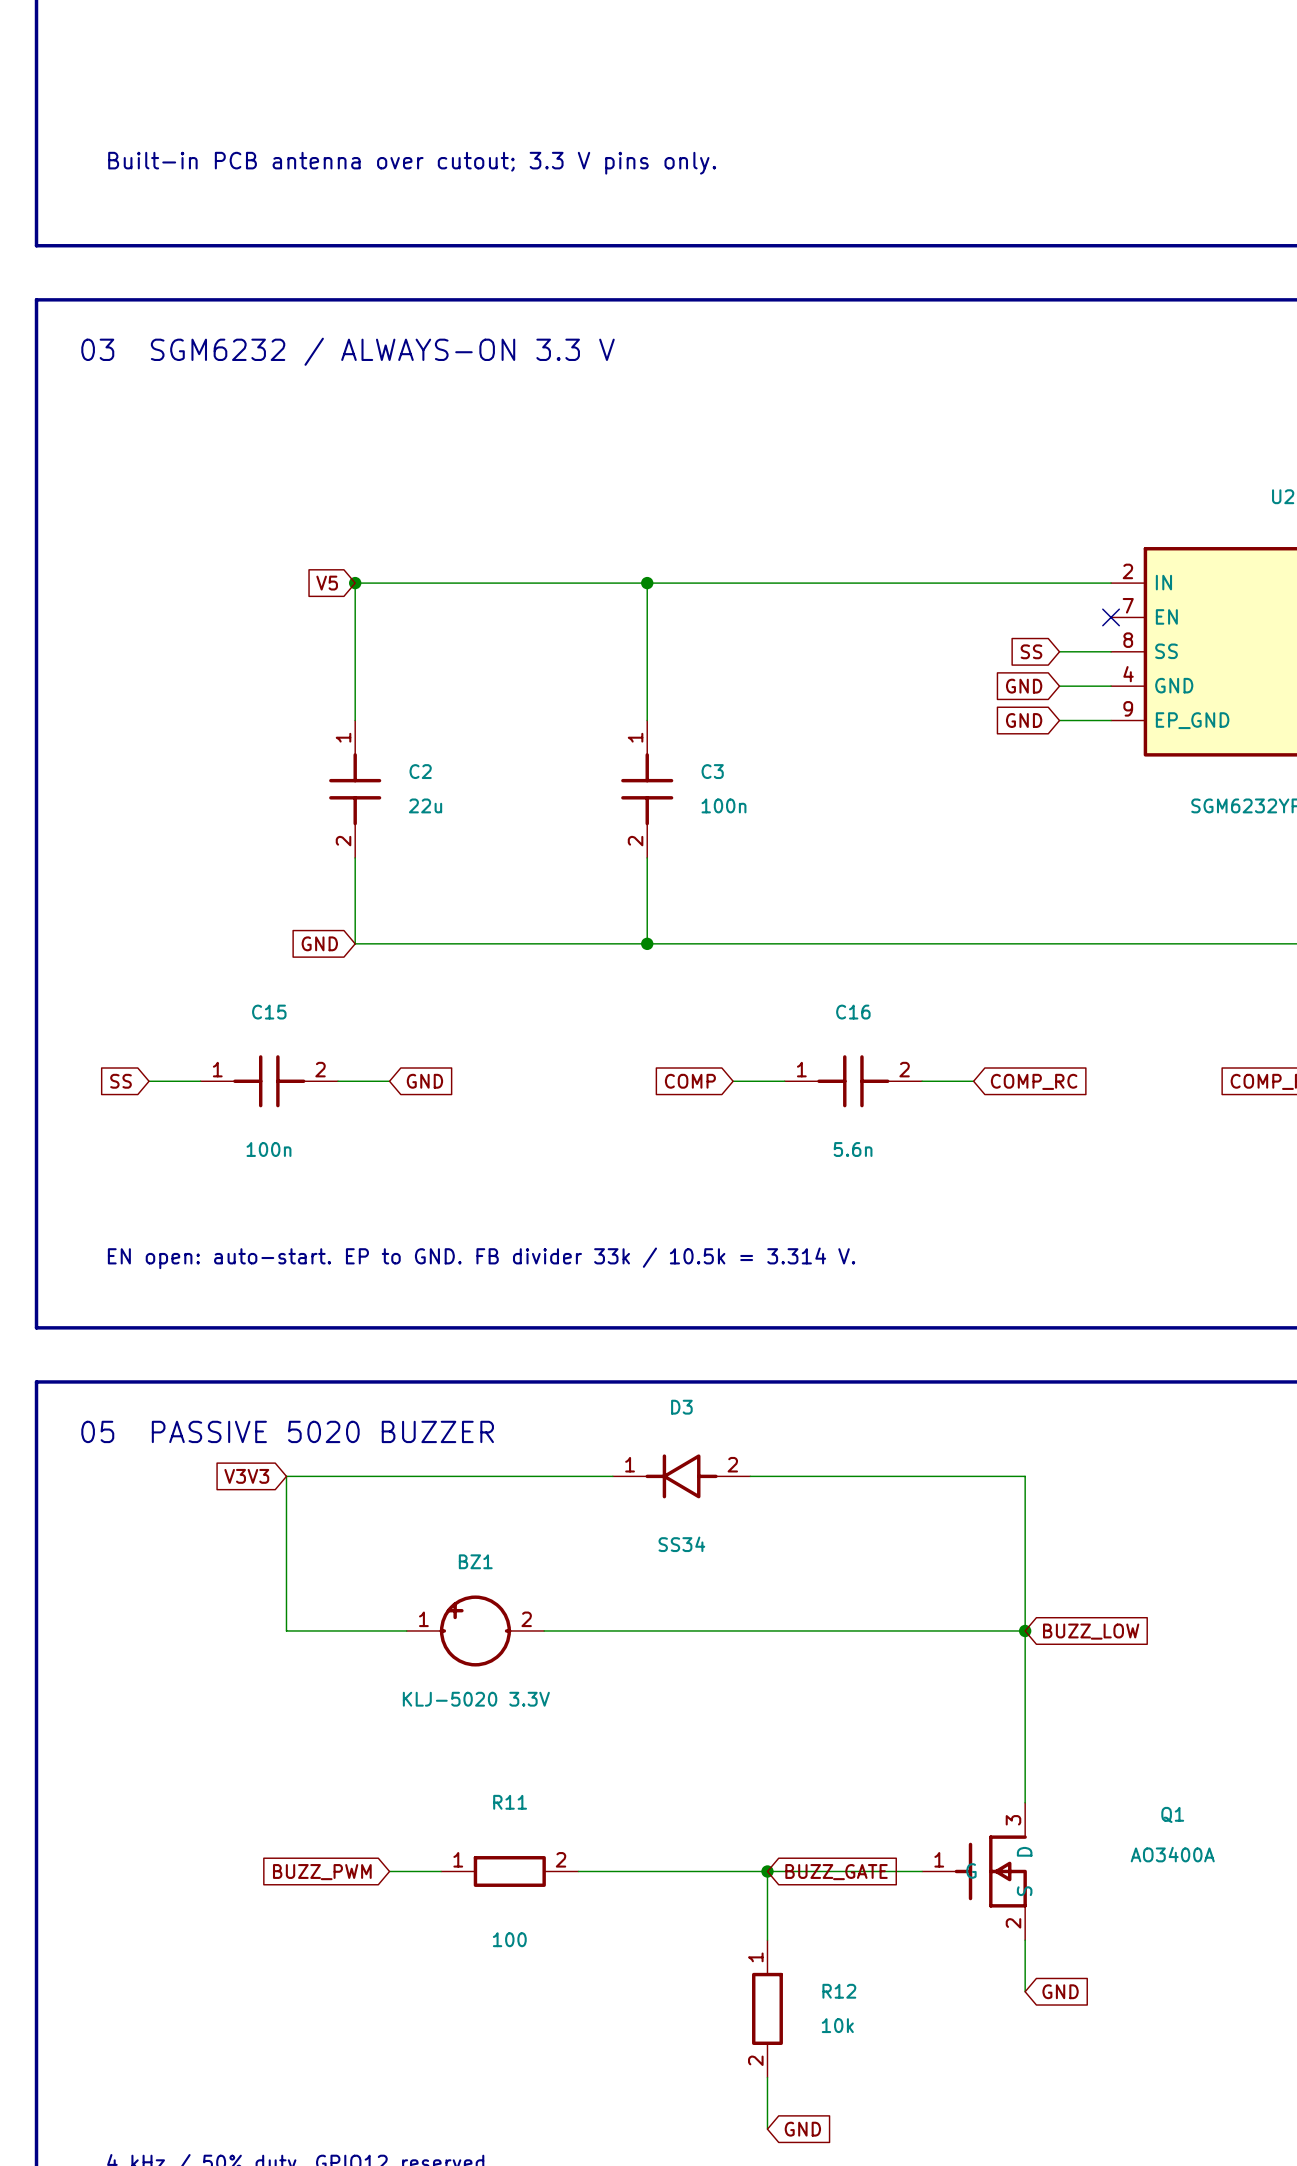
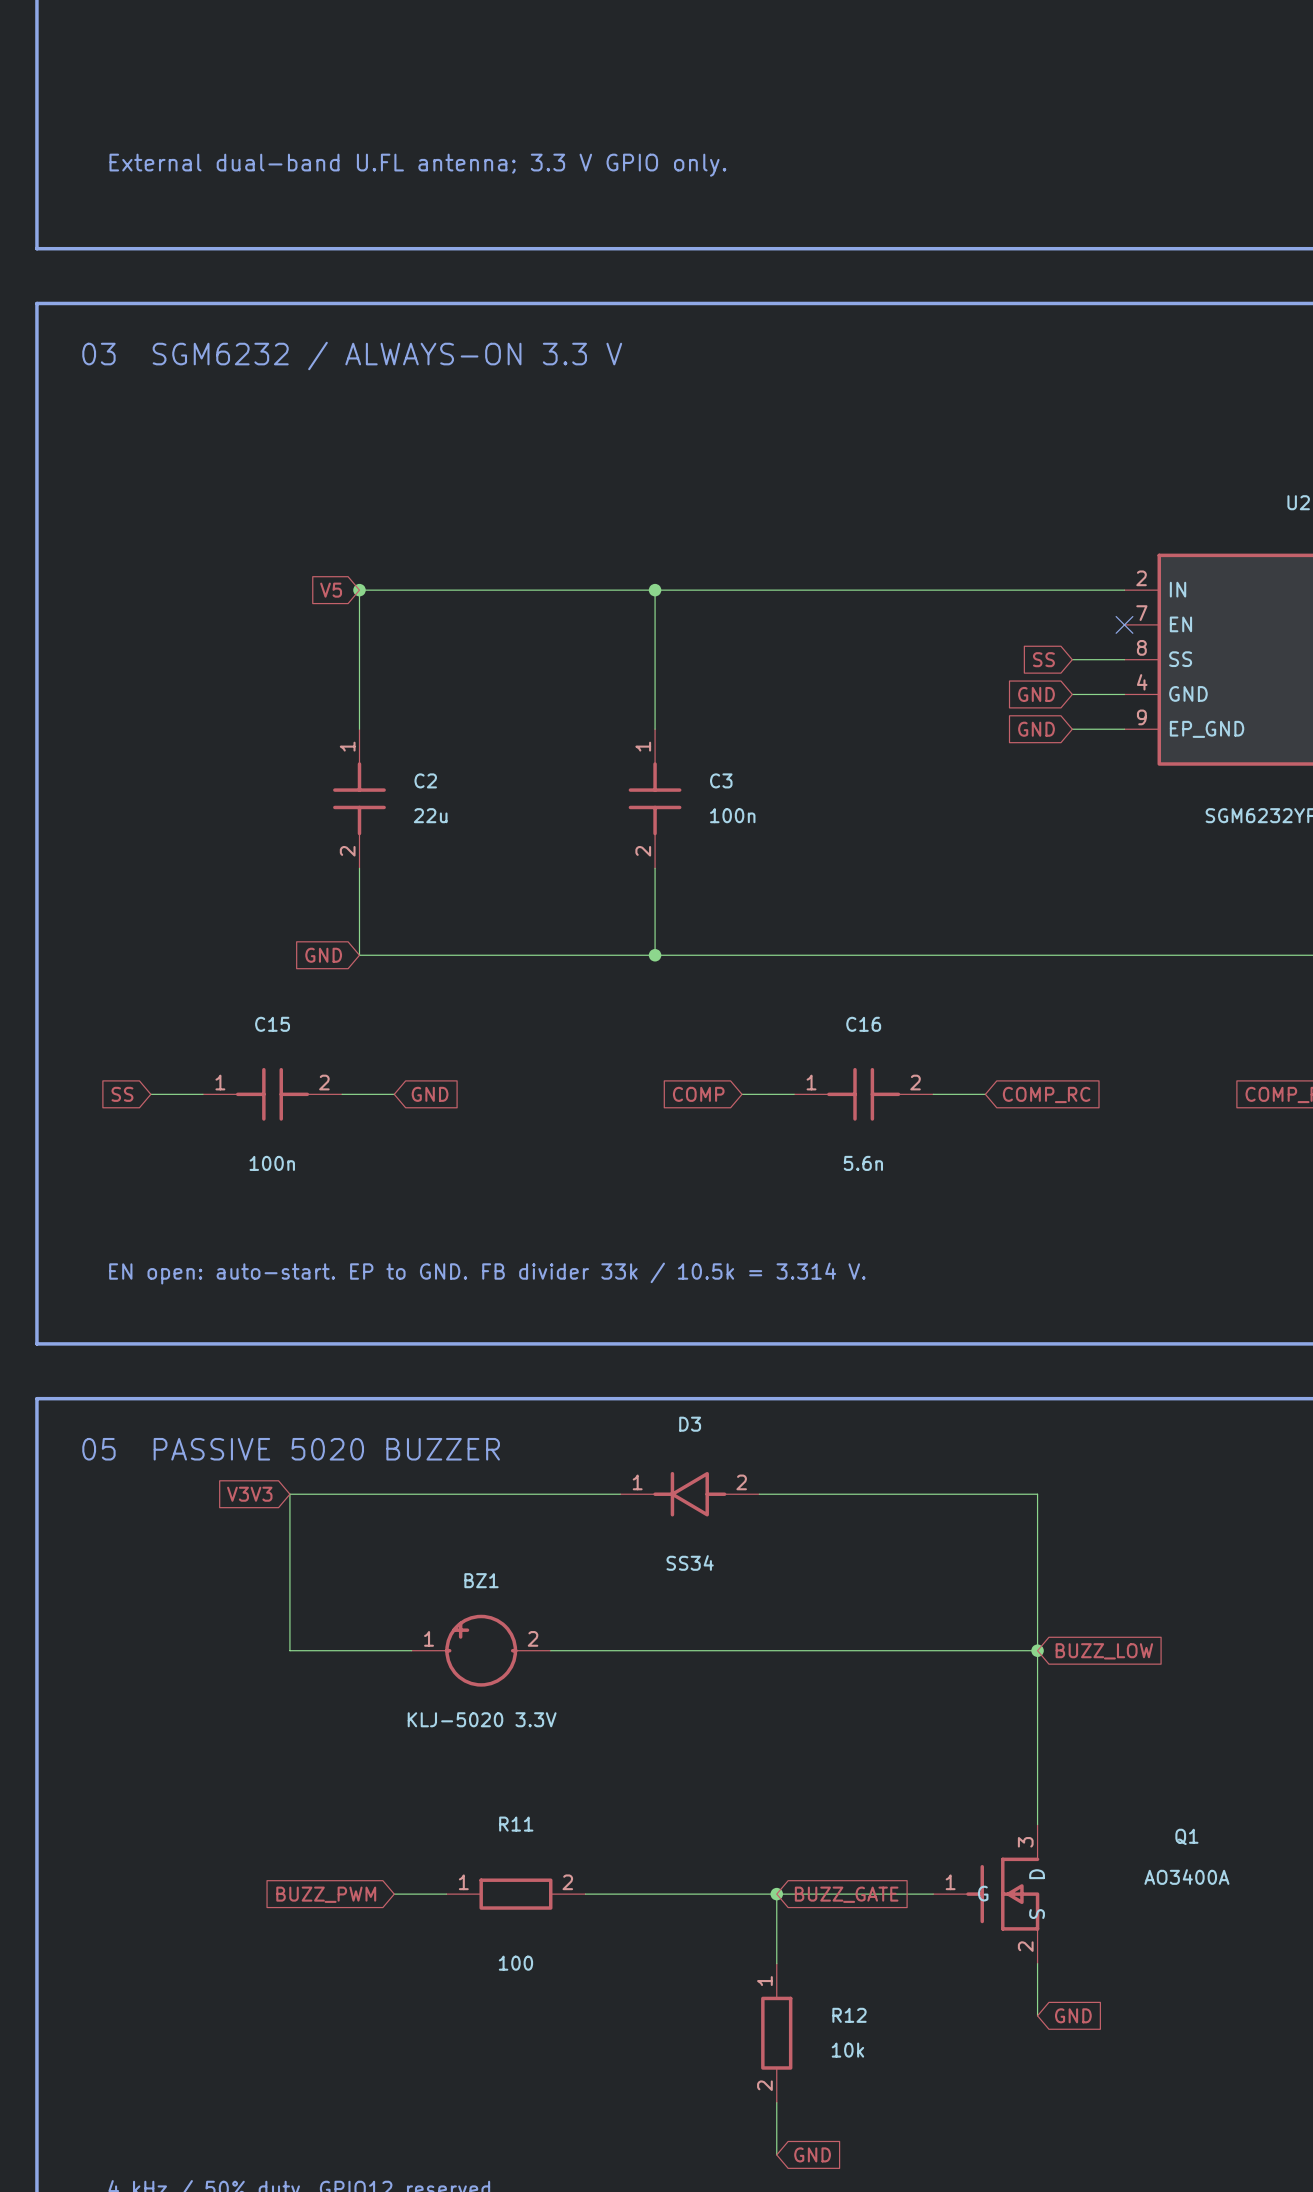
text: Built-in PCB antenna over cutout; 3.3 V pins only. (412, 163) -> External dual-band U.FL antenna; 3.3 V GPIO only. (417, 165)

